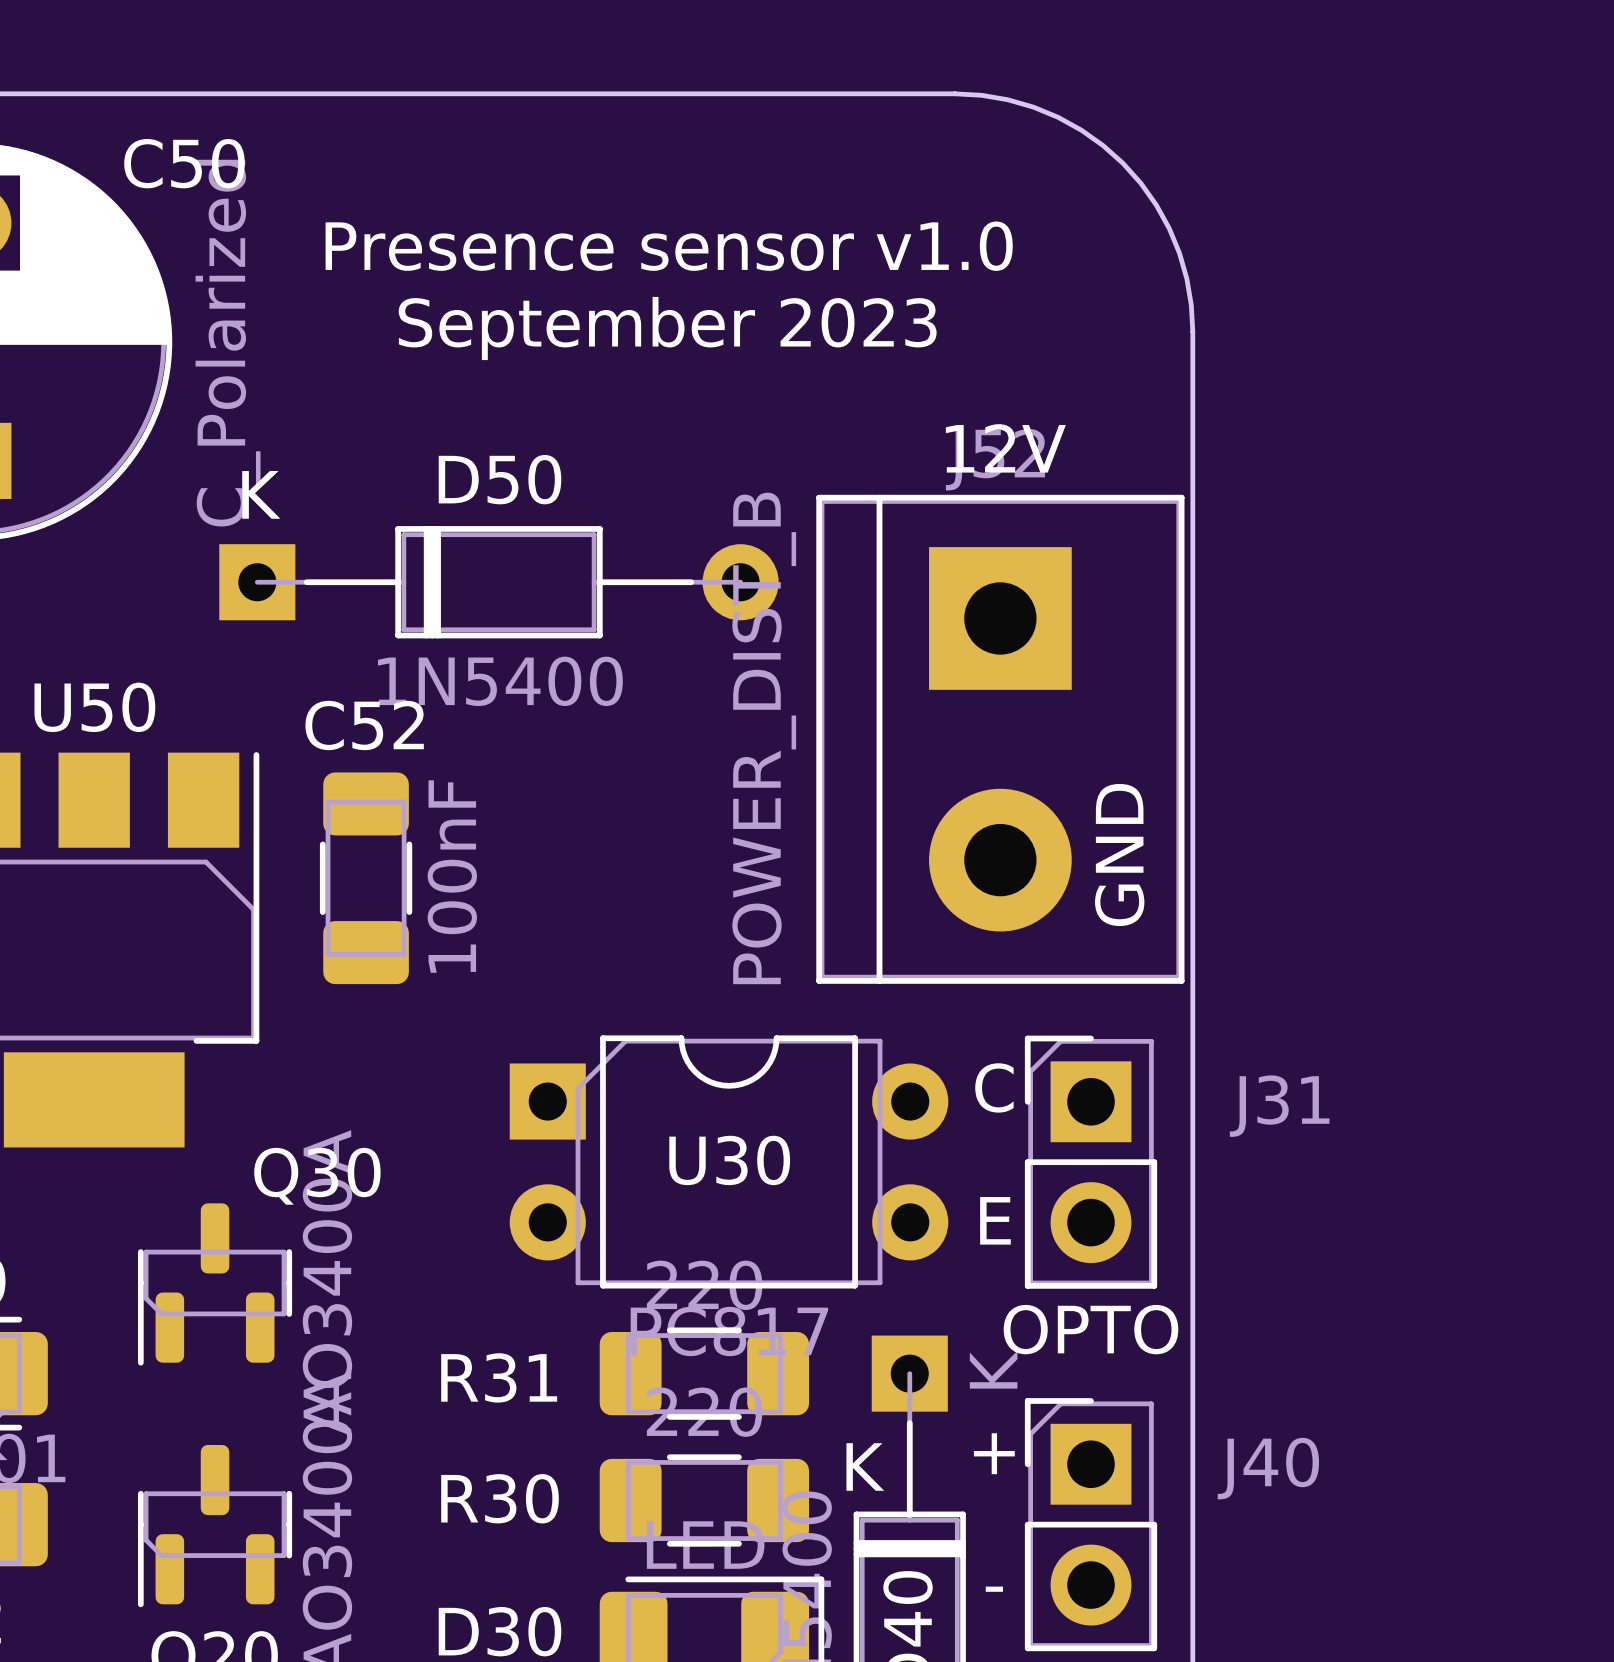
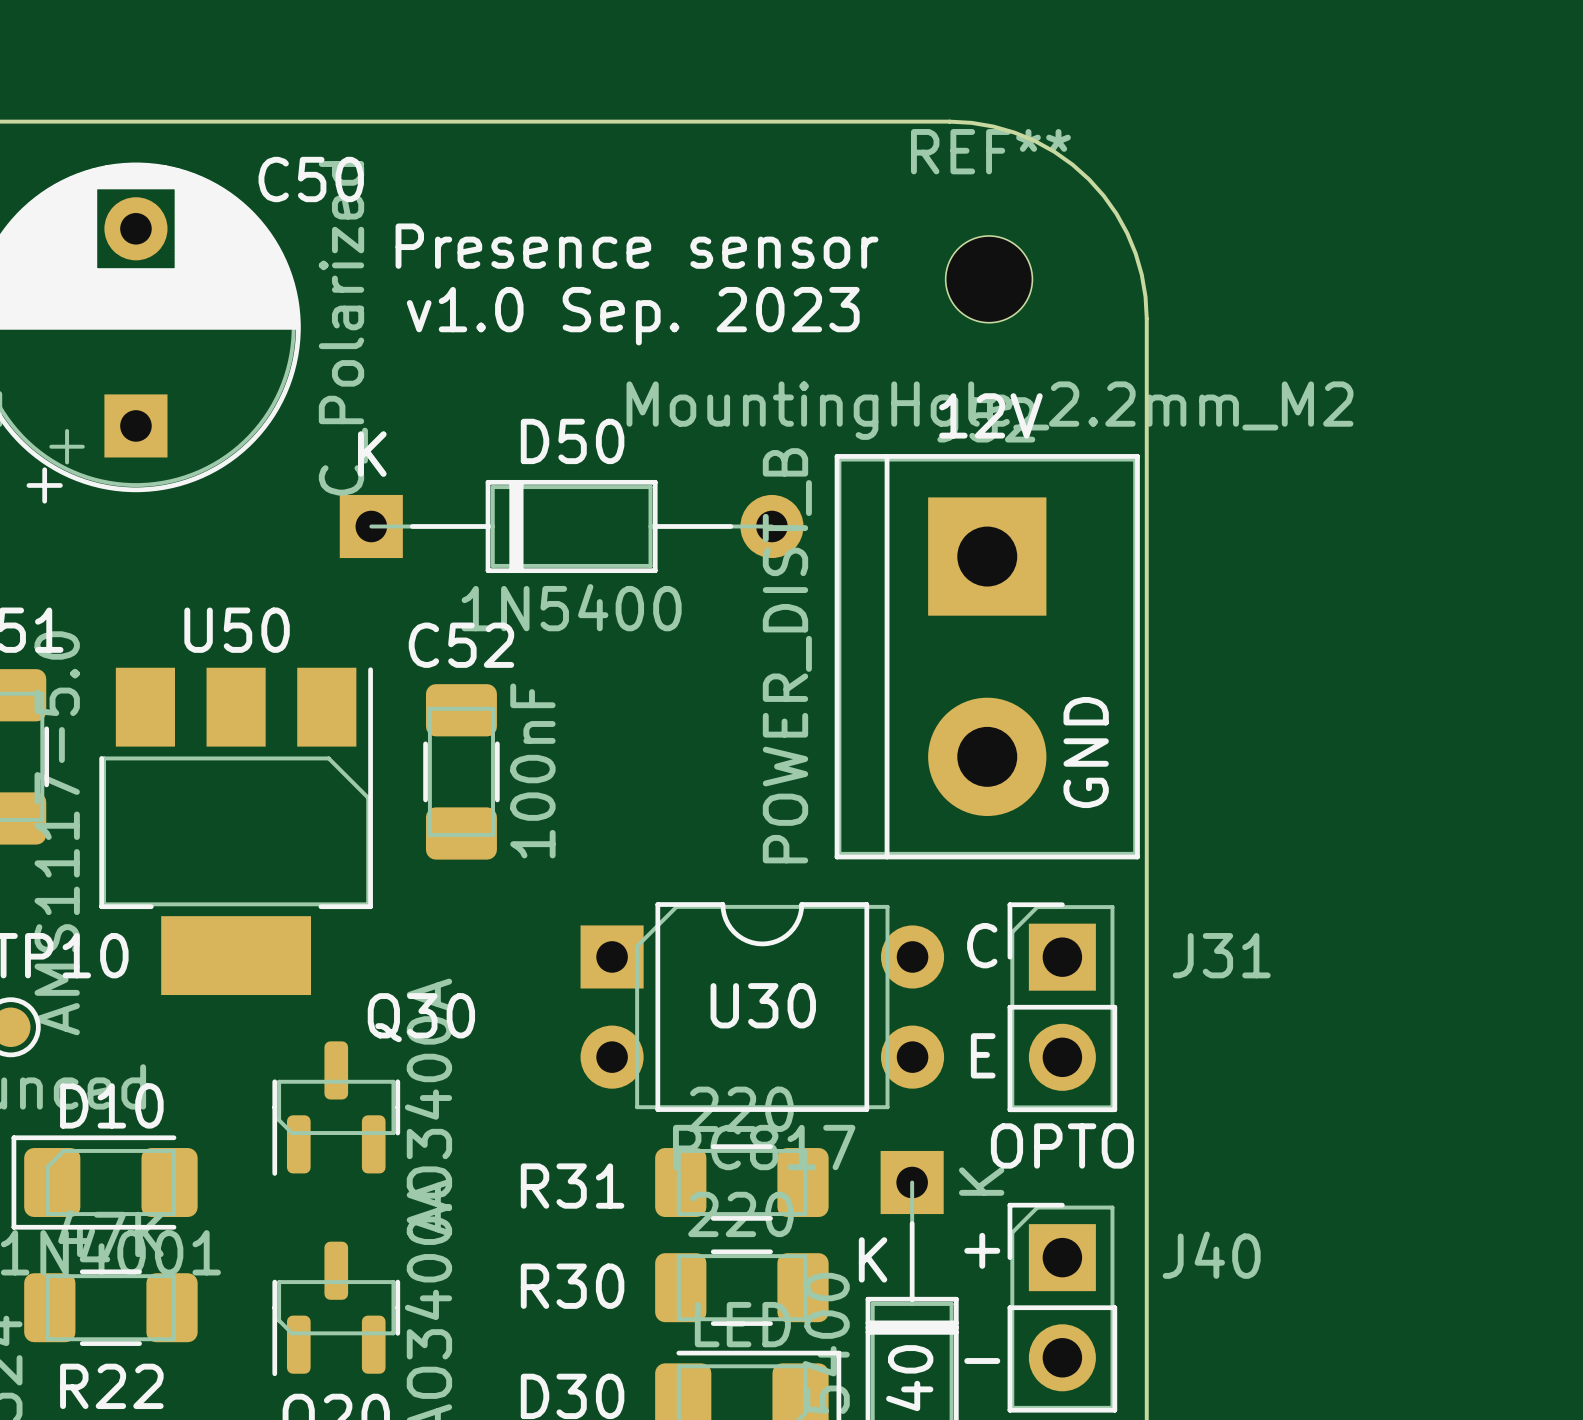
text: Presence sensor v1.0 (669, 246) -> Presence sensor (636, 246)
REF**: none -> MountingHole_2.2mm_M2 (989, 279)
text: none -> v1.0 Sep. 2023 (633, 316)
text: September 2023 (667, 328) -> none

